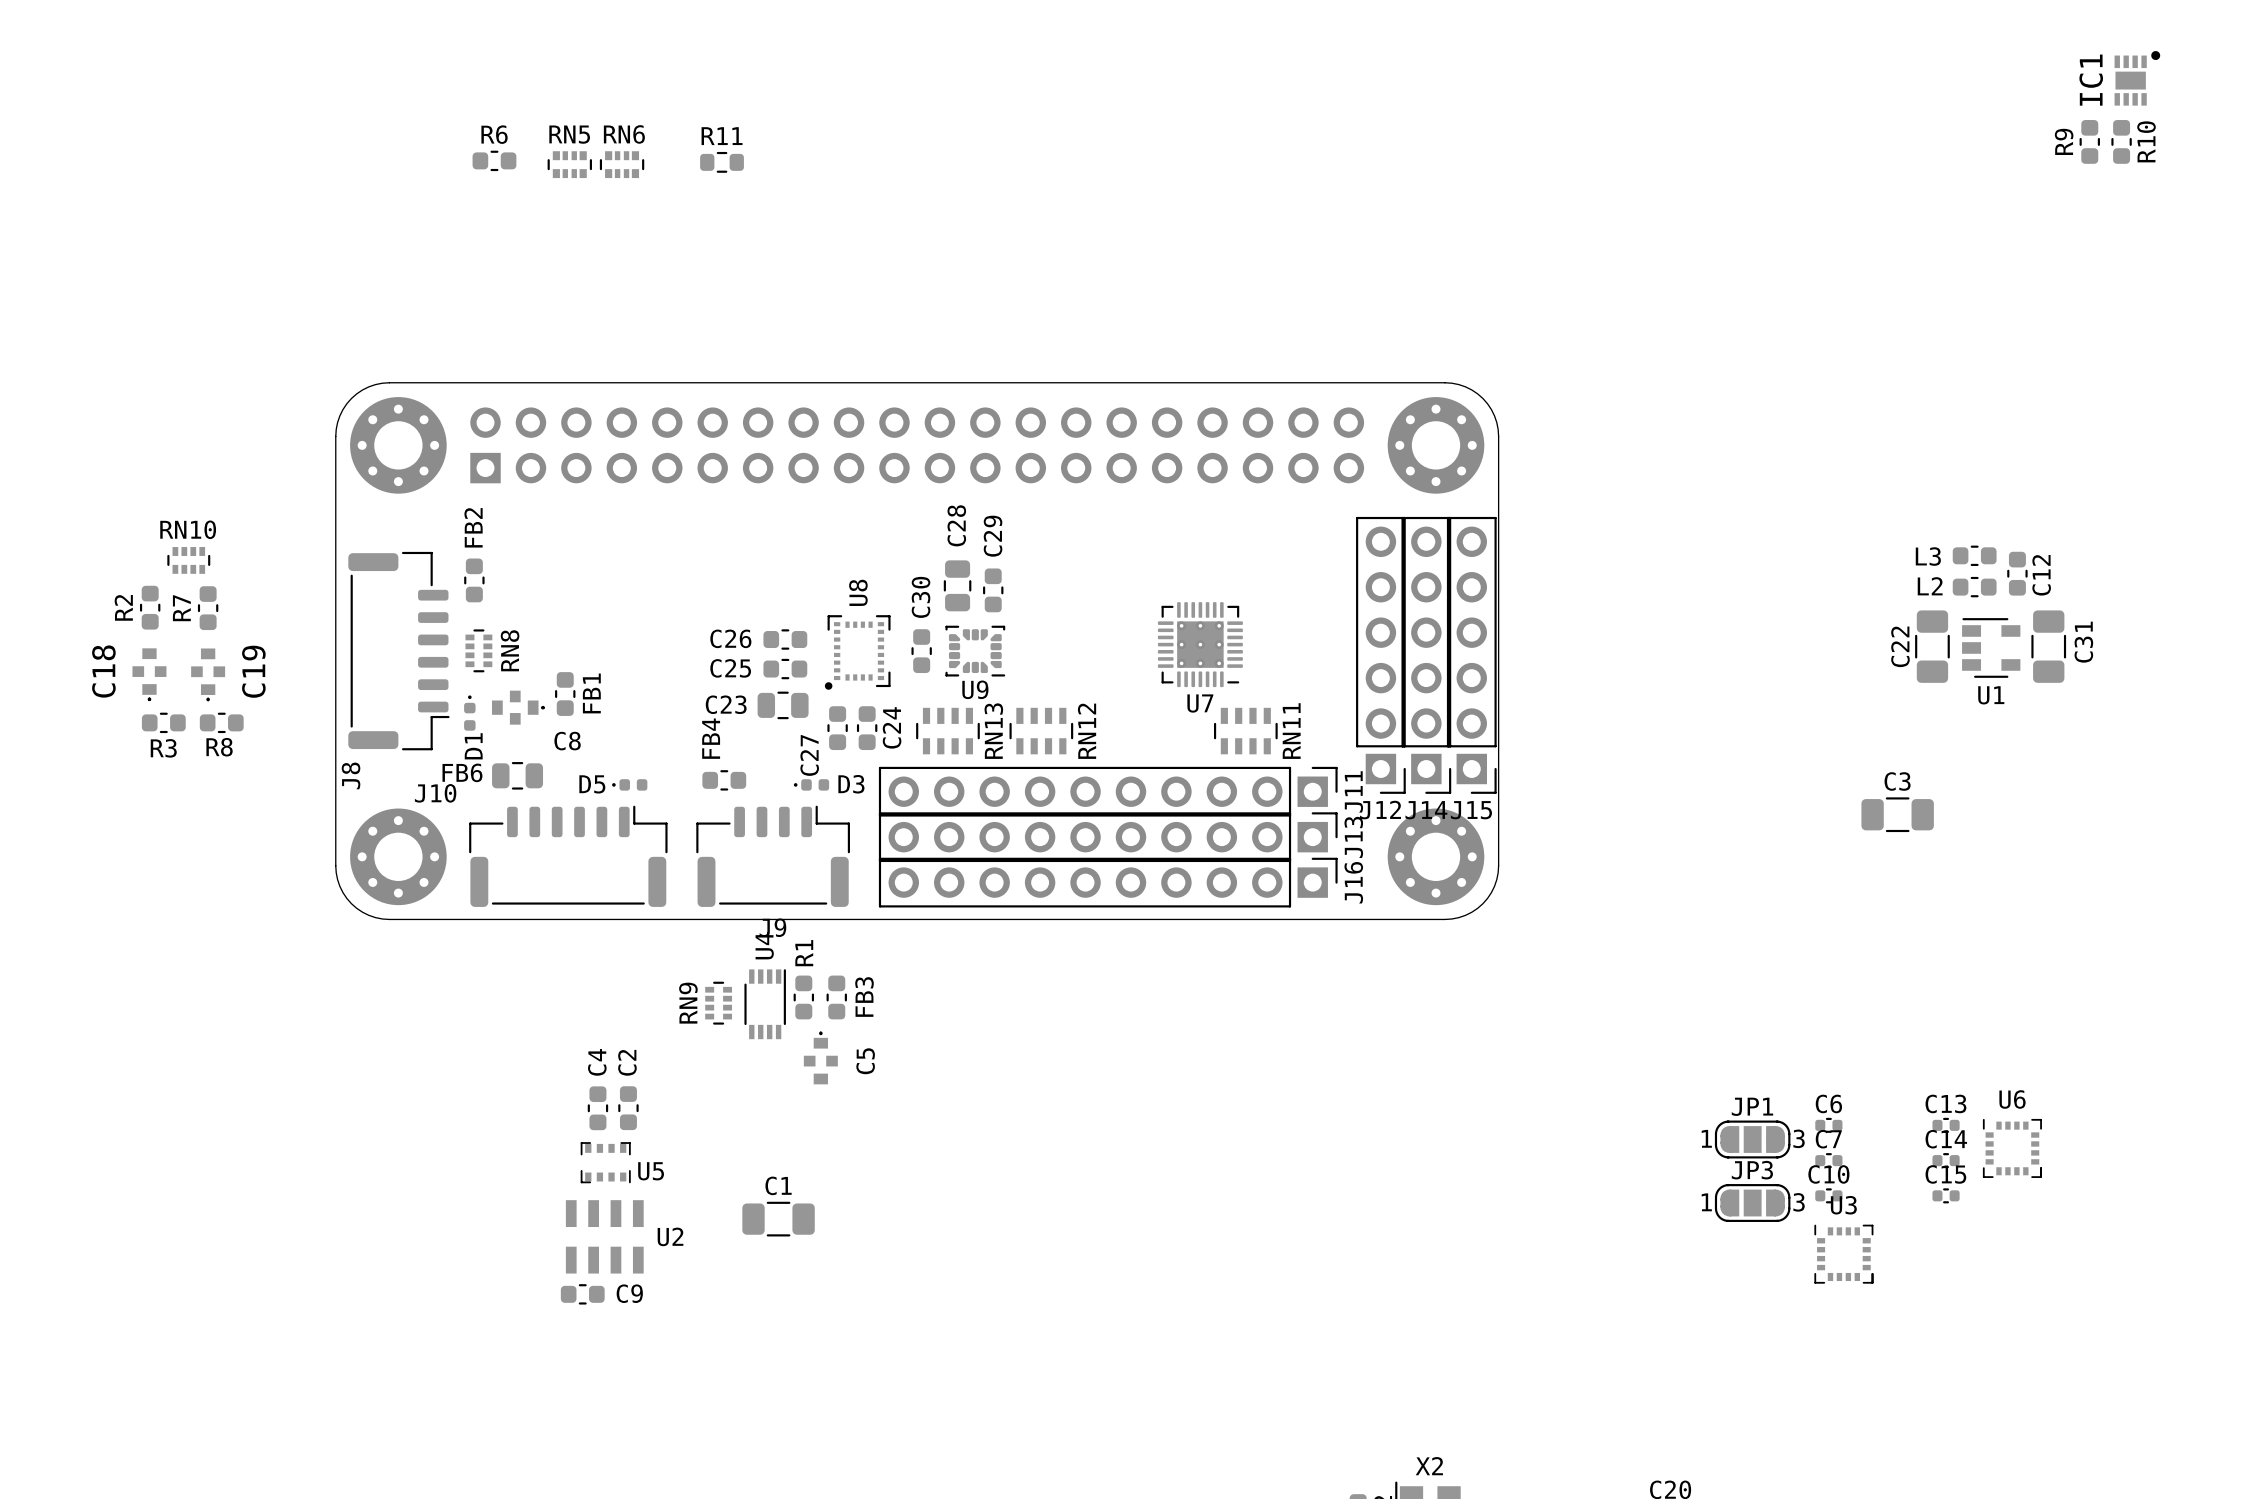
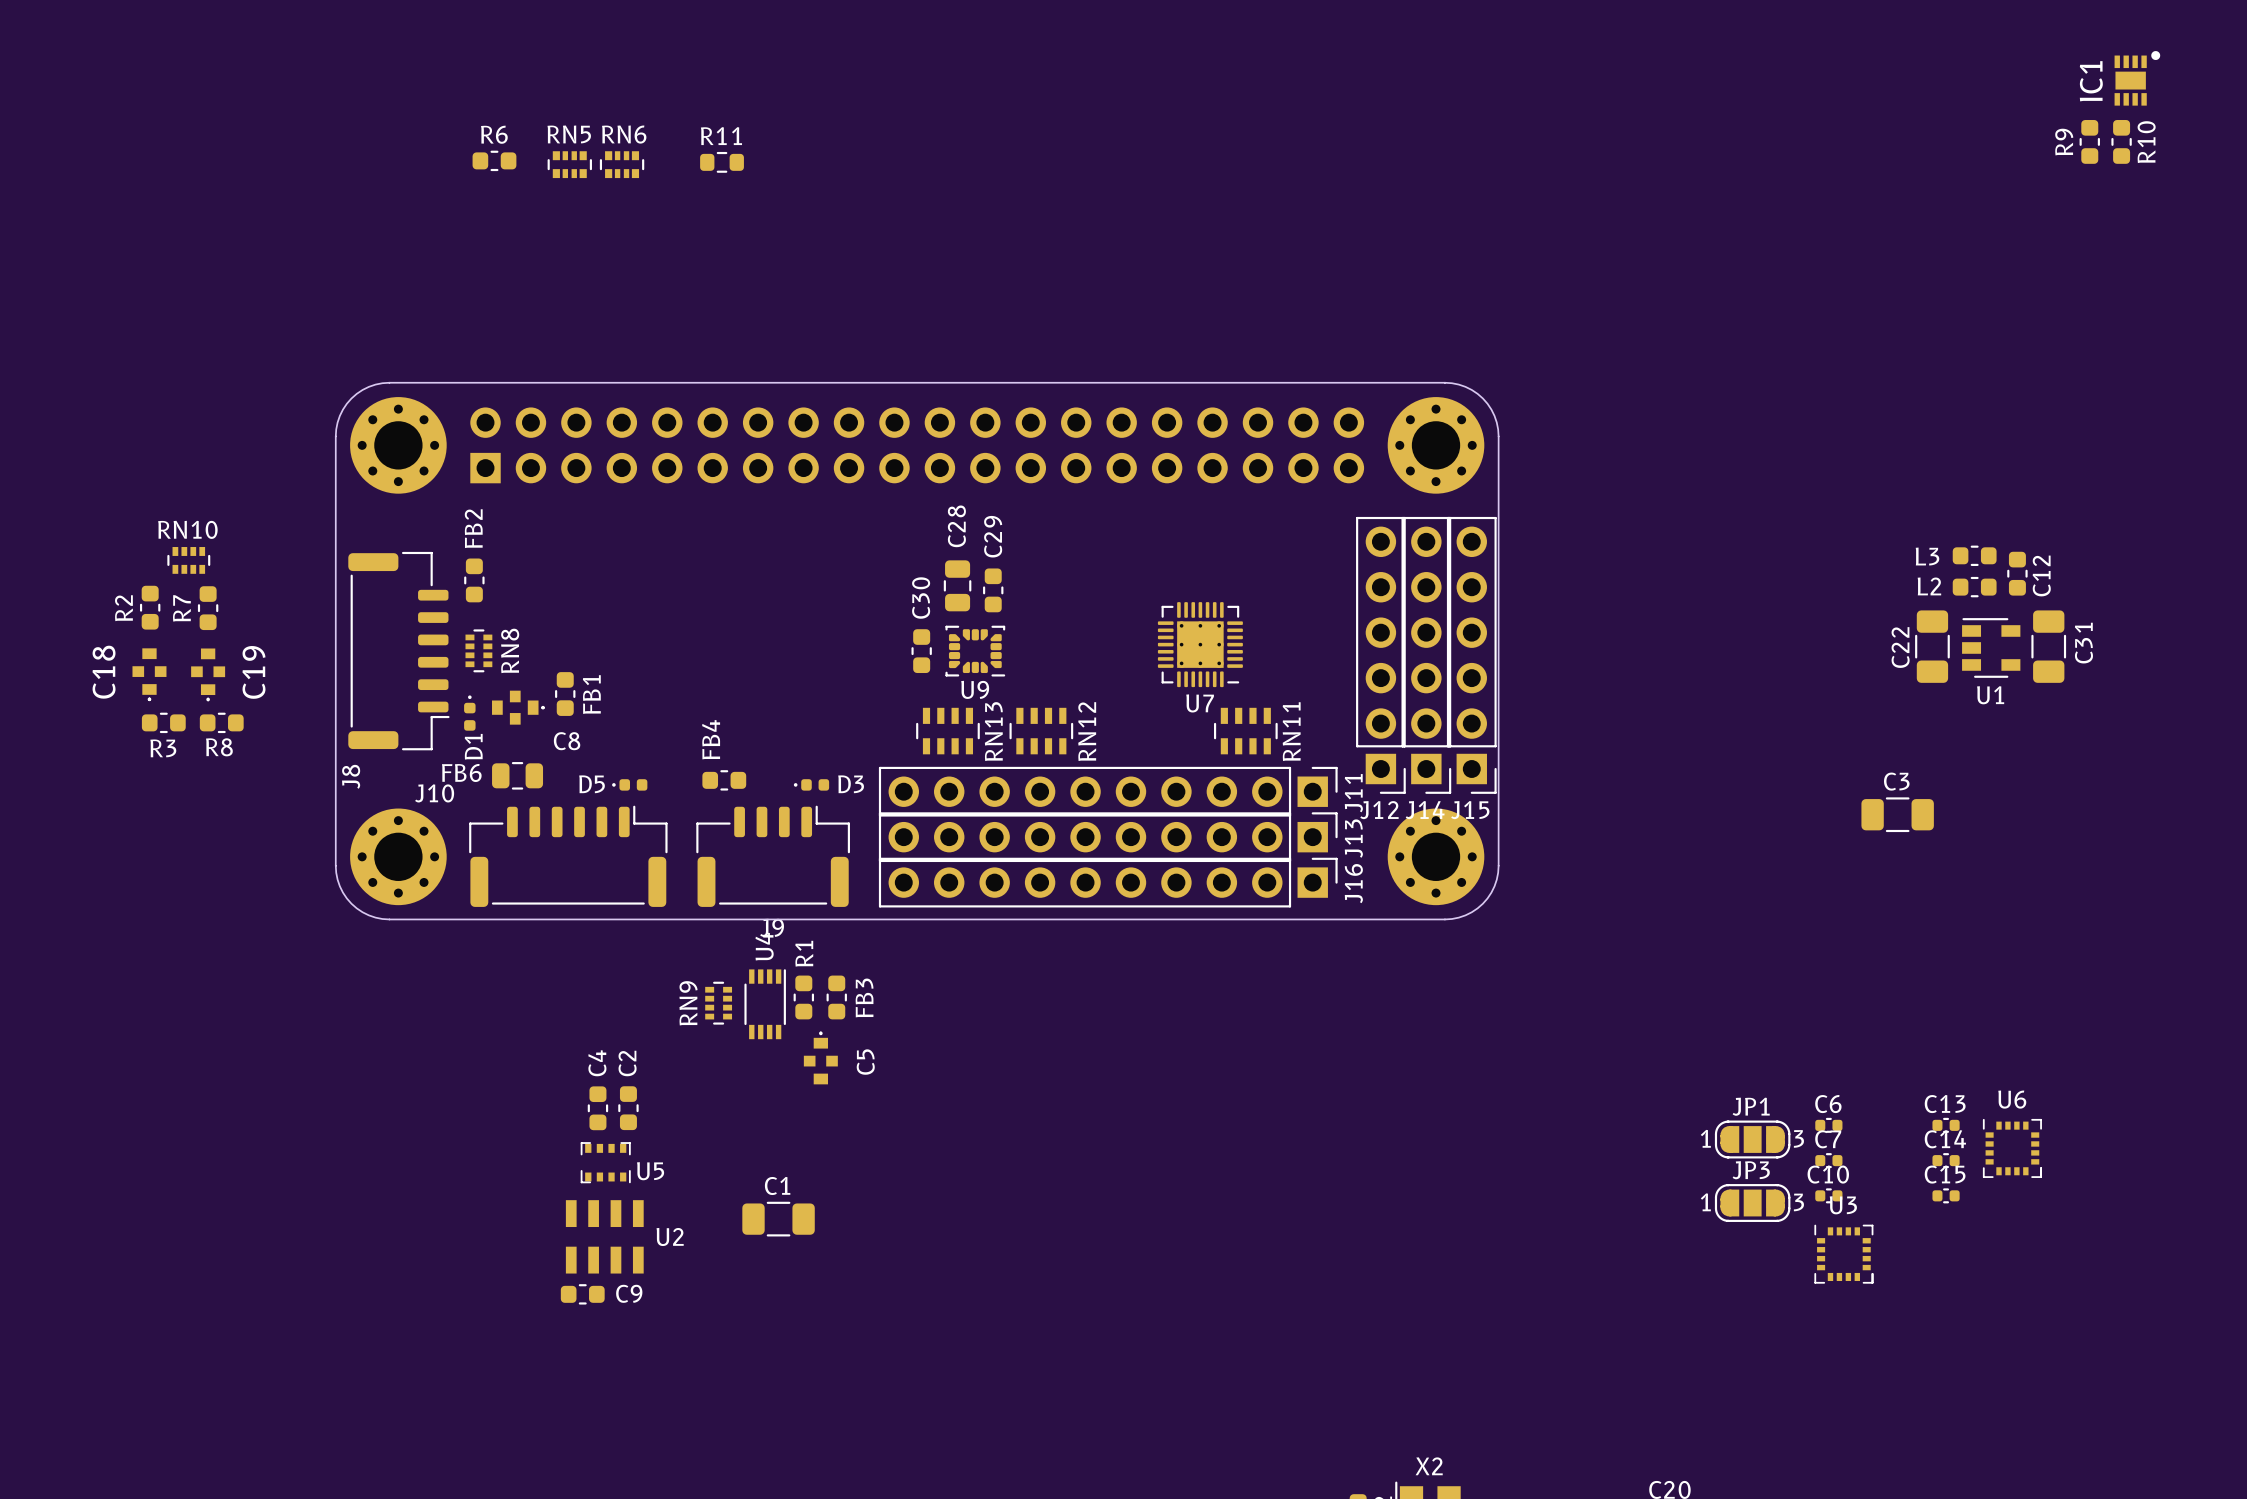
C26: (785, 639) -> none
U8: (857, 652) -> none
C25: (785, 669) -> none
C23: (783, 705) -> none
C27: (837, 728) -> none
C24: (867, 728) -> none

